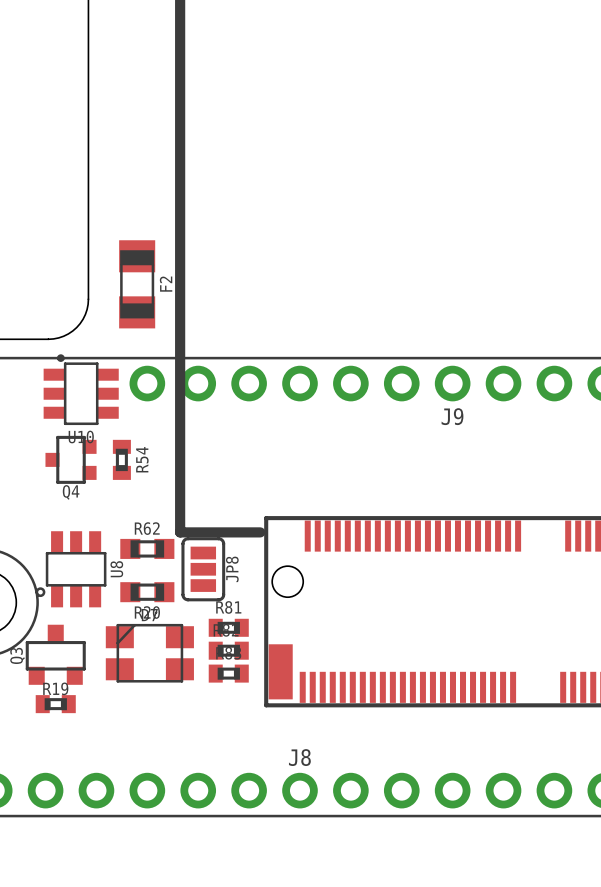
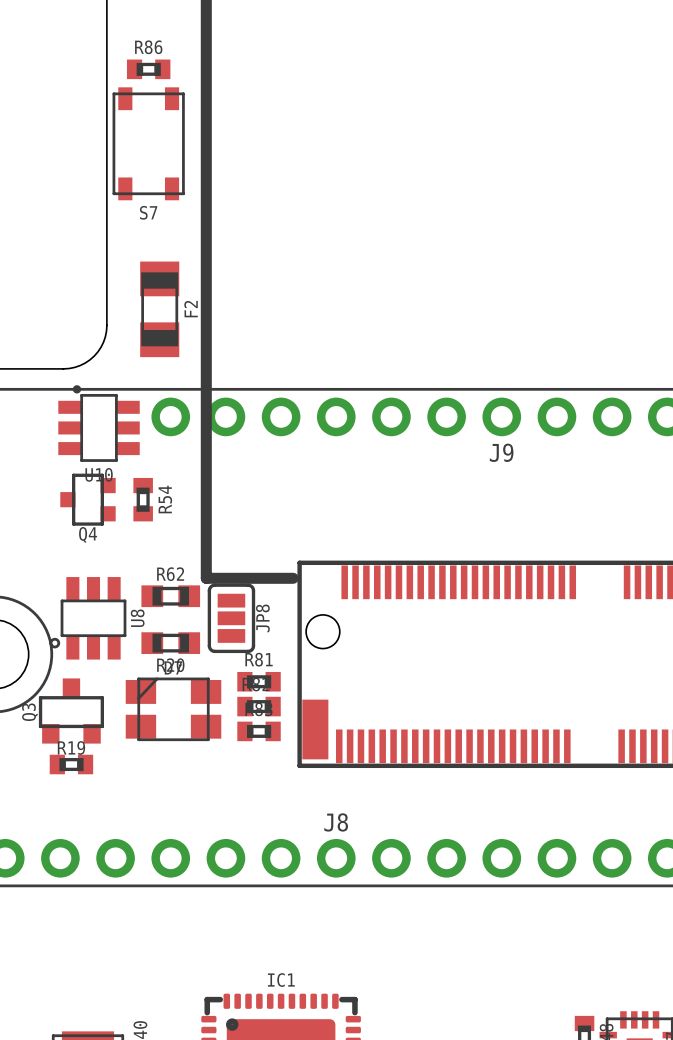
R86: none -> (148, 69)
S7: none -> (148, 143)

